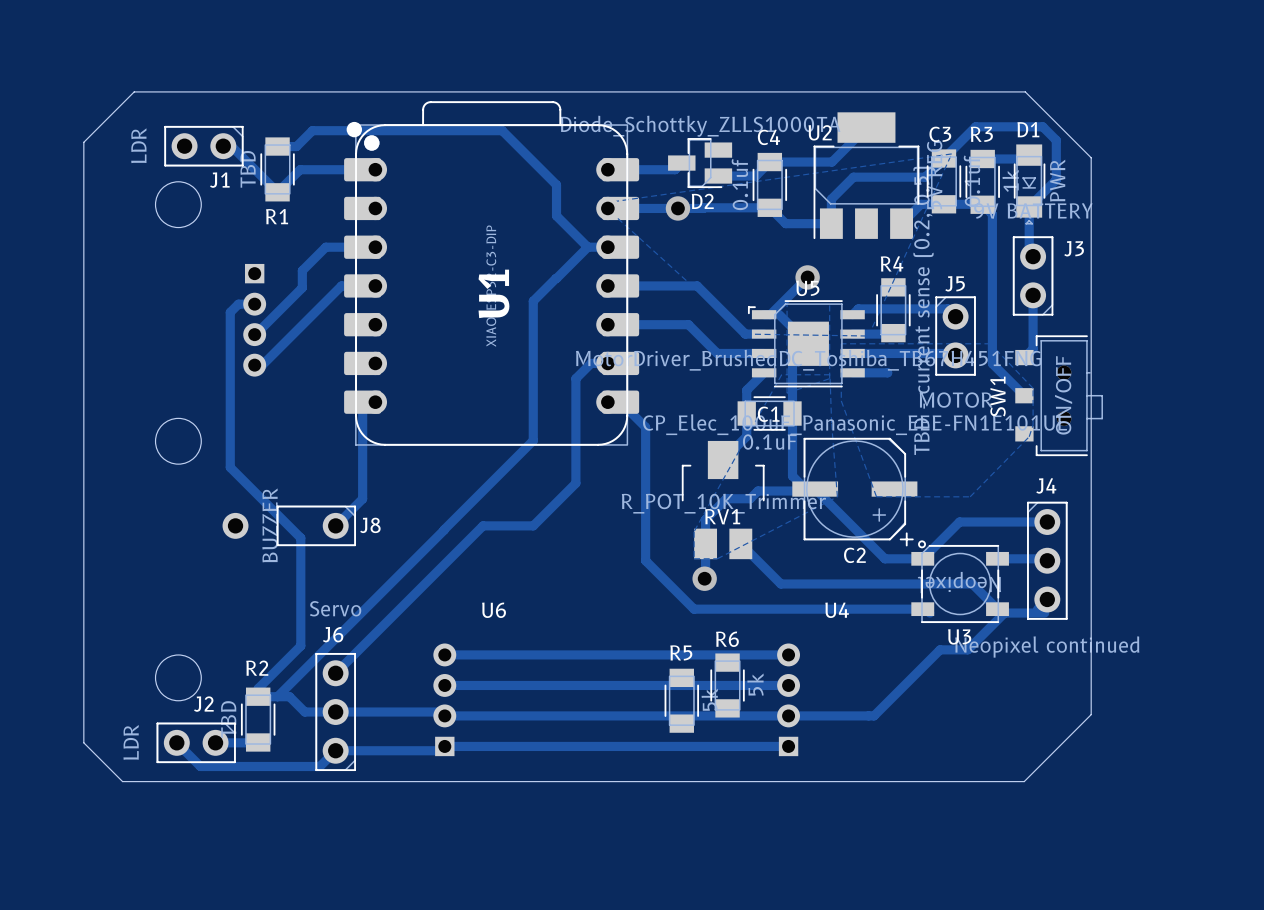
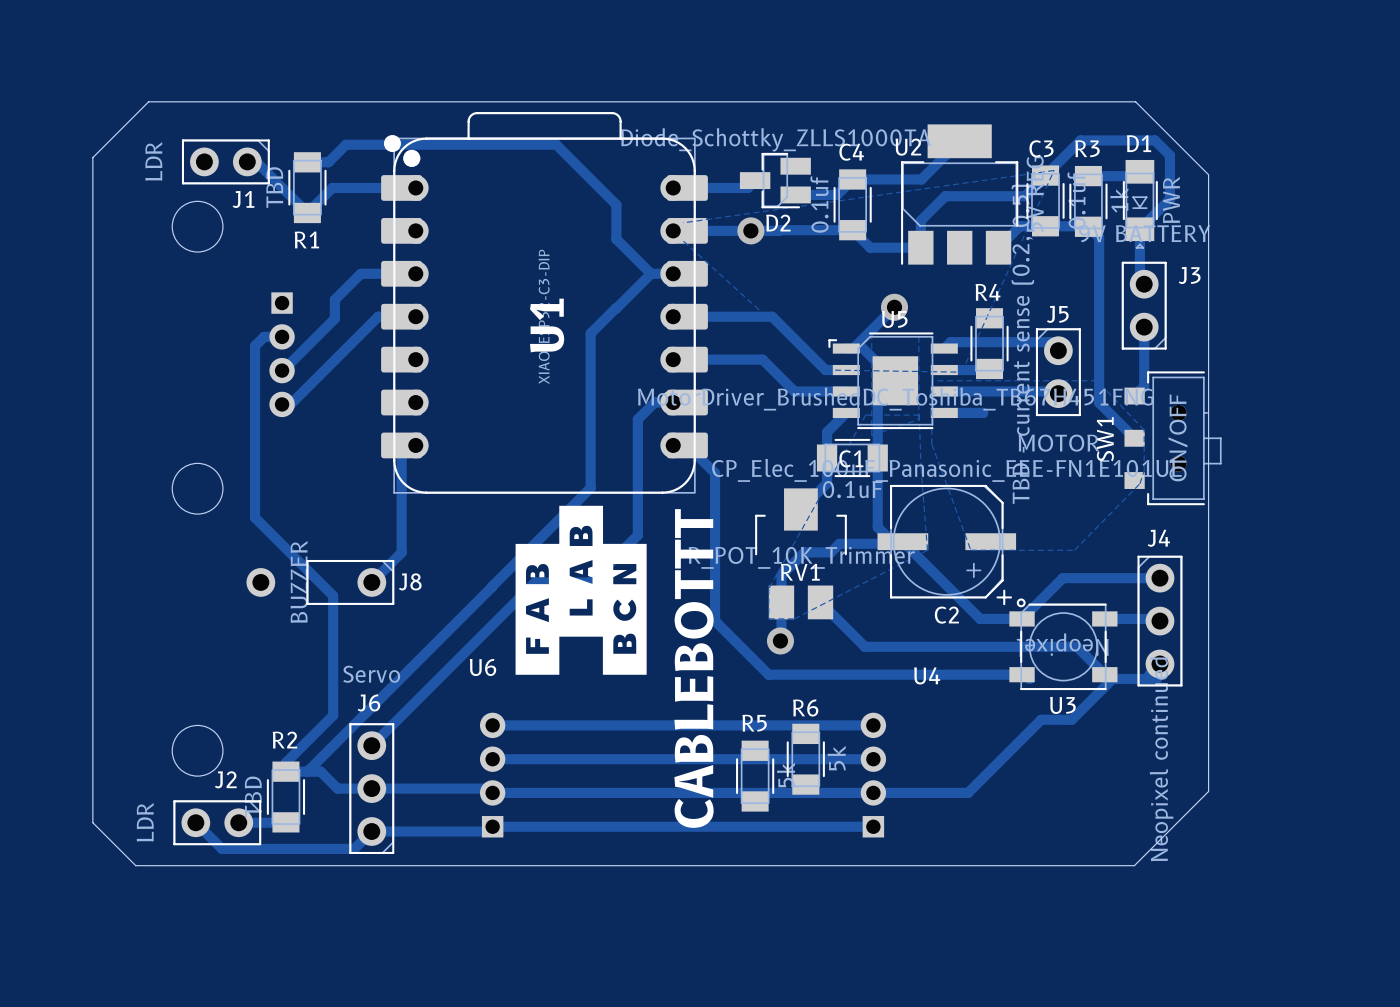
drawing: none -> [515, 505, 647, 675]
text: none -> CABLEBOTTT (694, 668)
U6 name position: U6 (494, 610) -> U6 (482, 667)
J4 value rotation: 0° (1047, 646) -> 90° counterclockwise (1161, 759)

